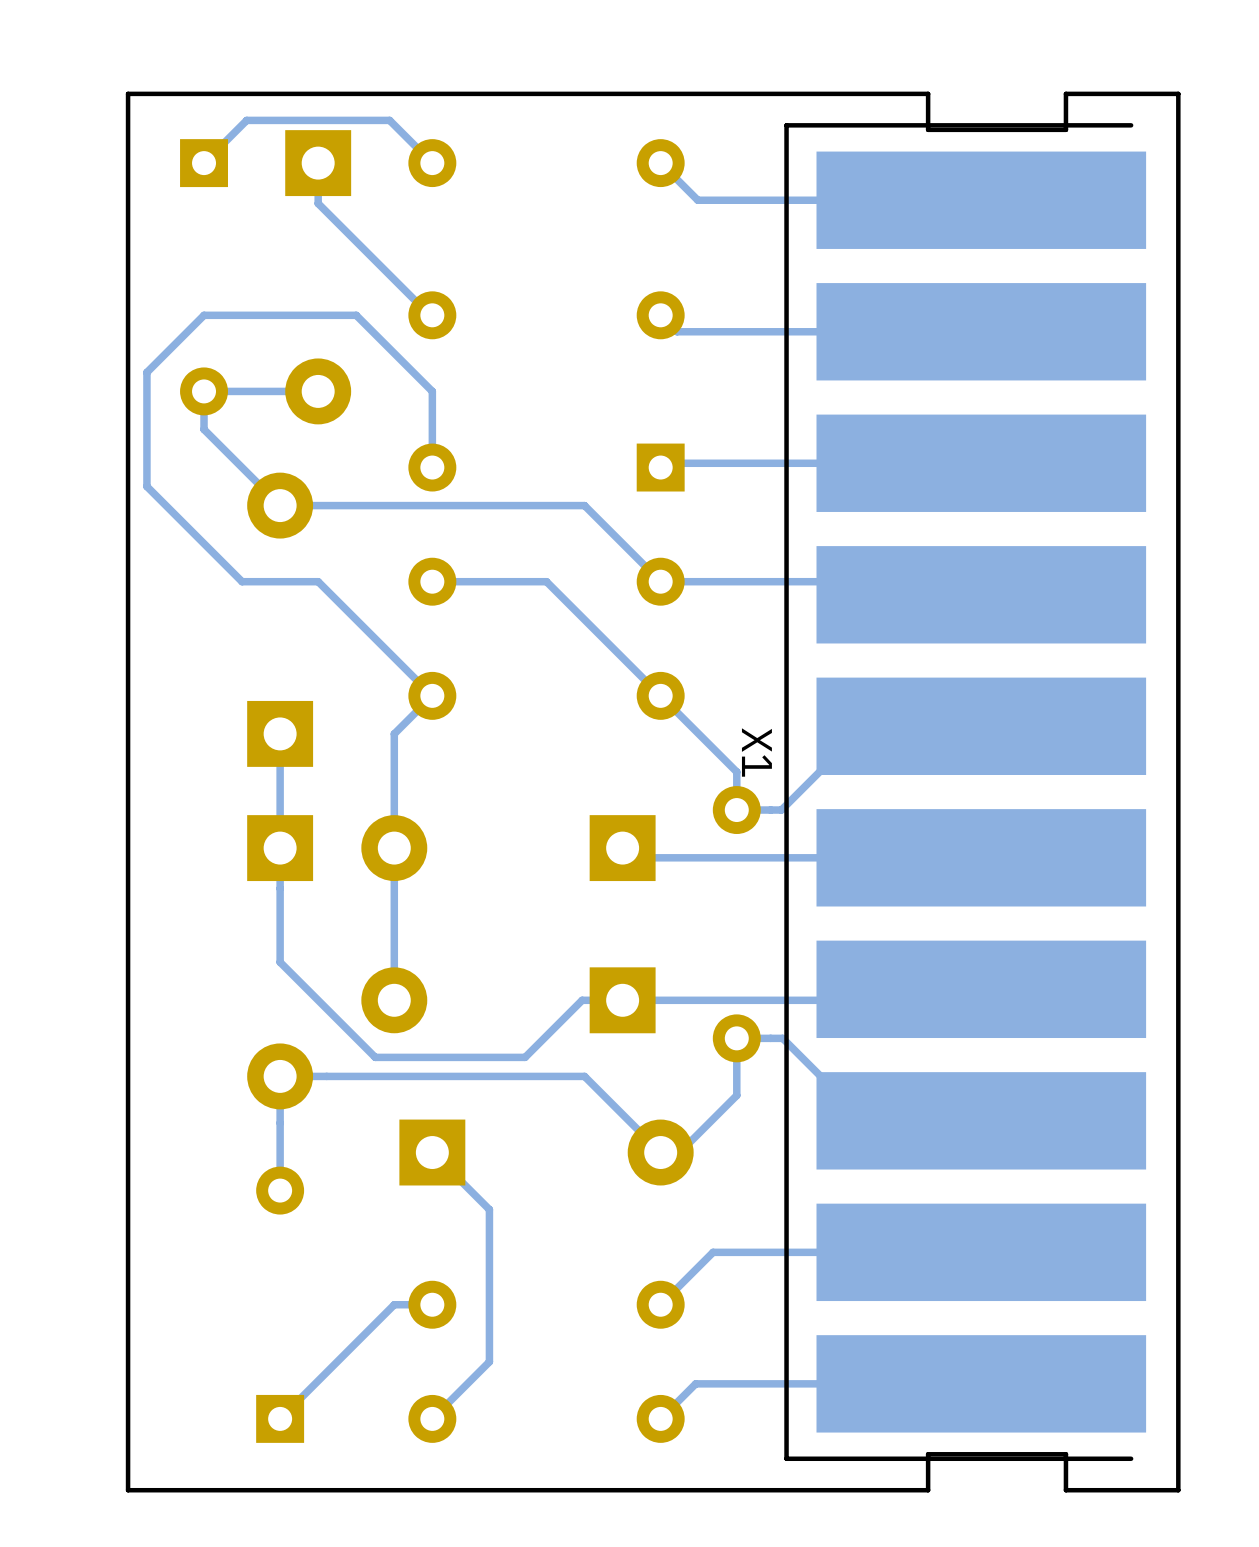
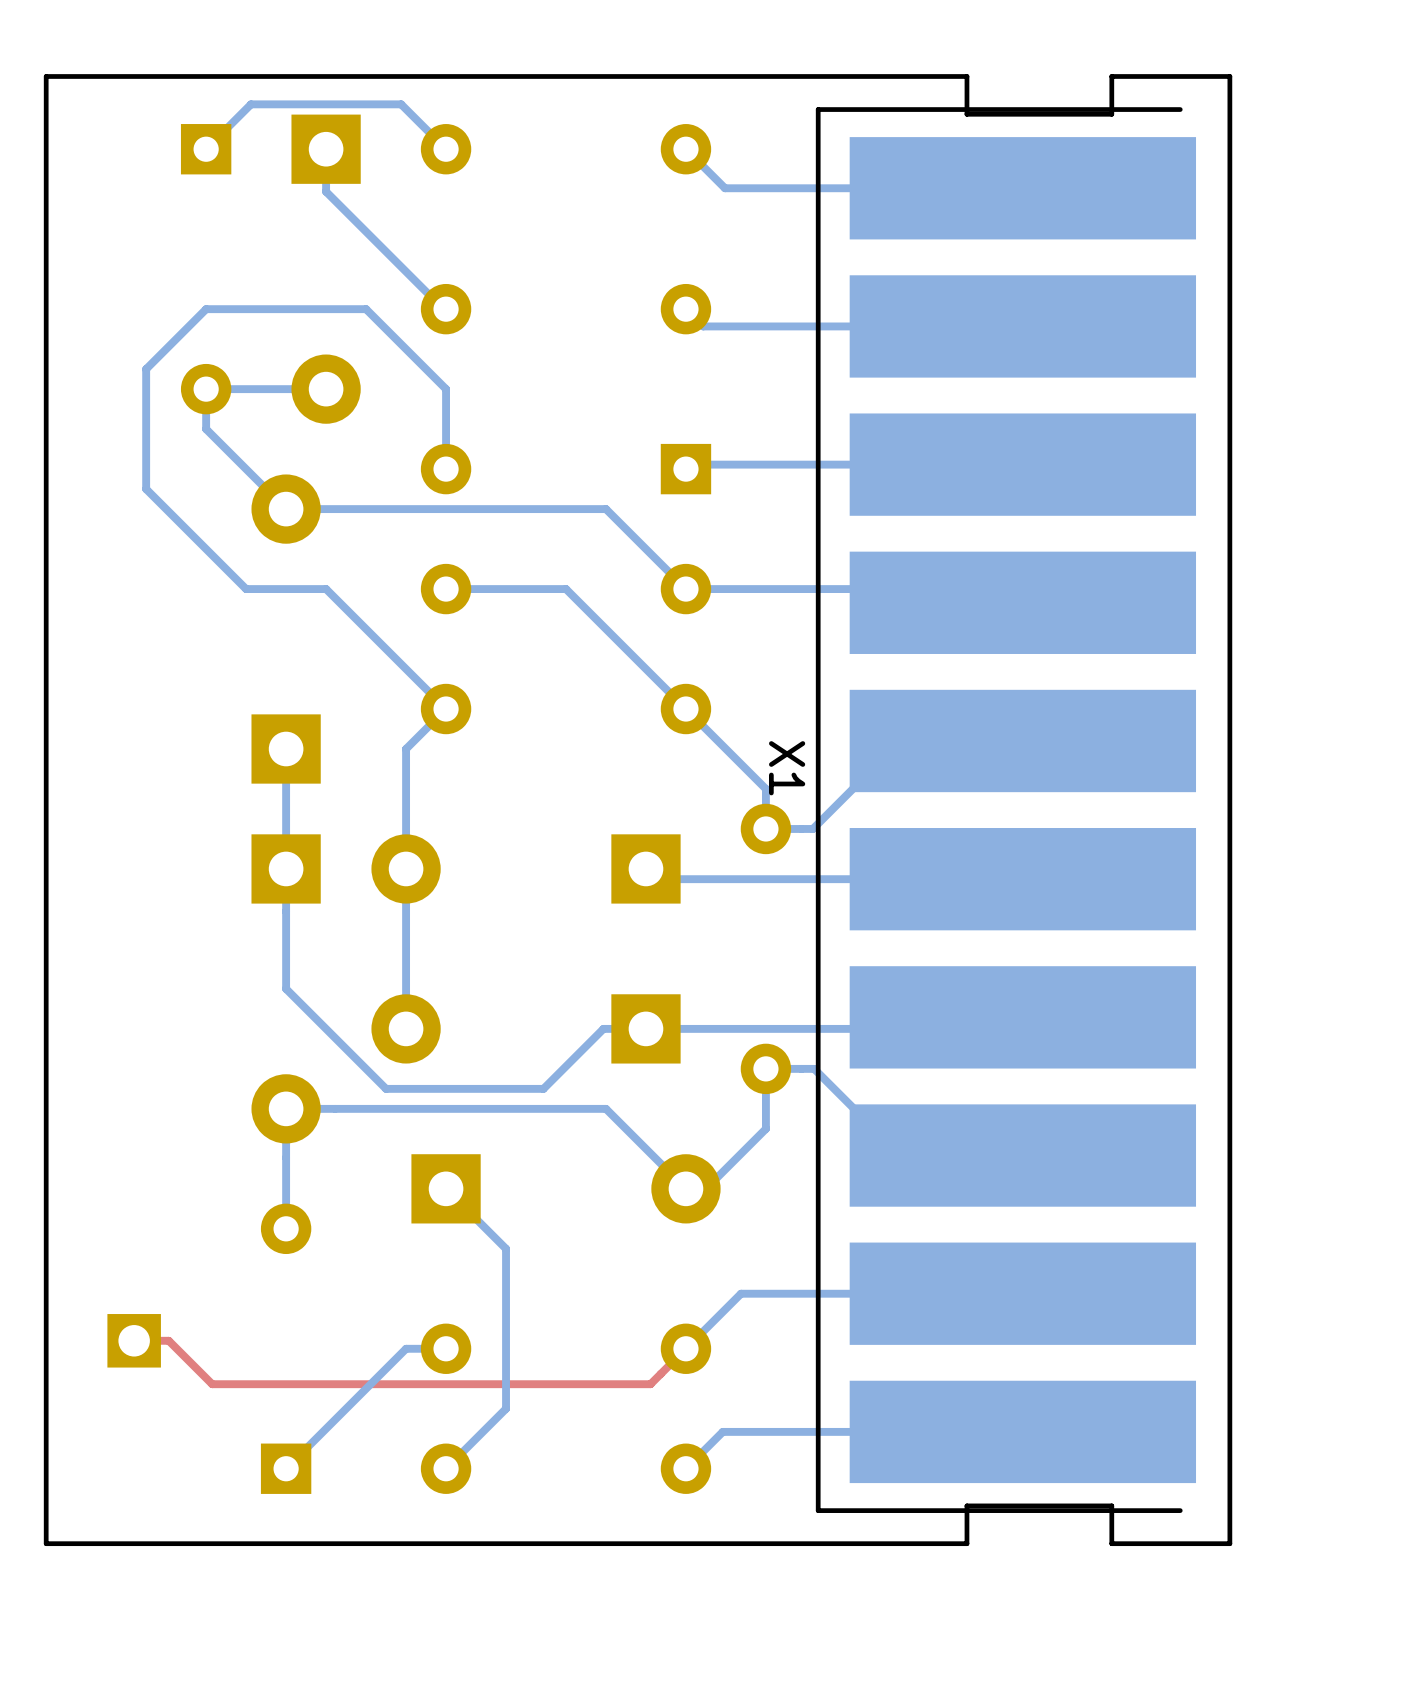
board edge: (128, 93) (128, 1490) -> (126, 76) (46, 76) (46, 1543) (126, 1543)
top track: none -> (134, 1340) (168, 1340) (212, 1384) (650, 1384) (685, 1348)
part: none -> (134, 1340)

